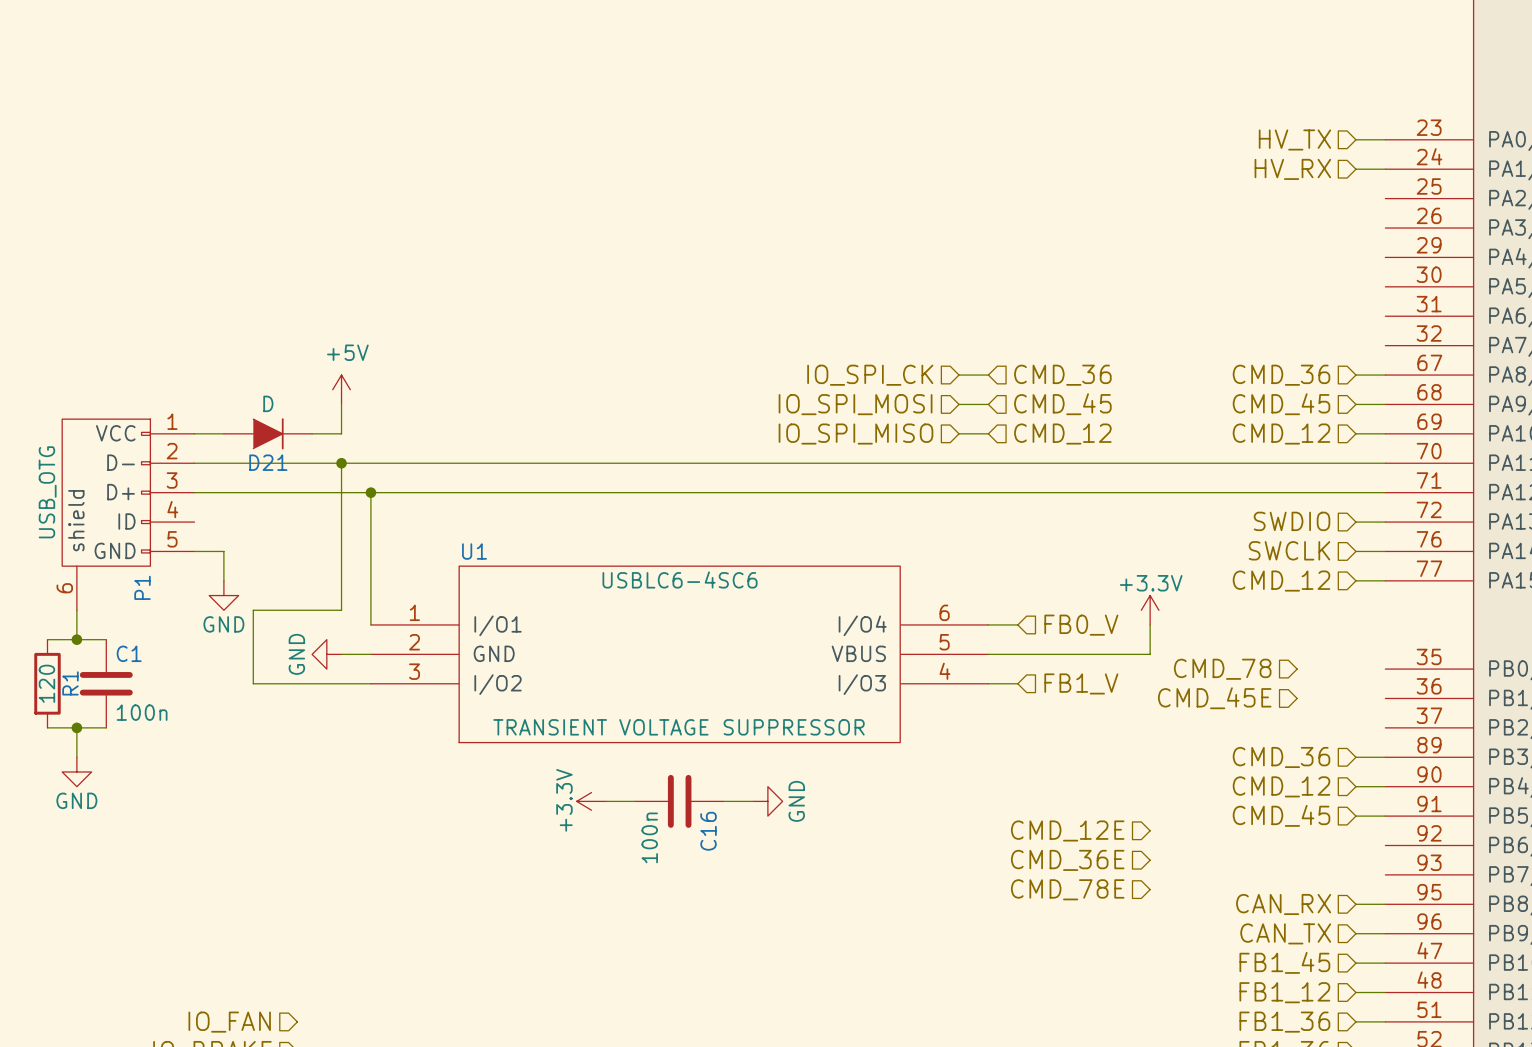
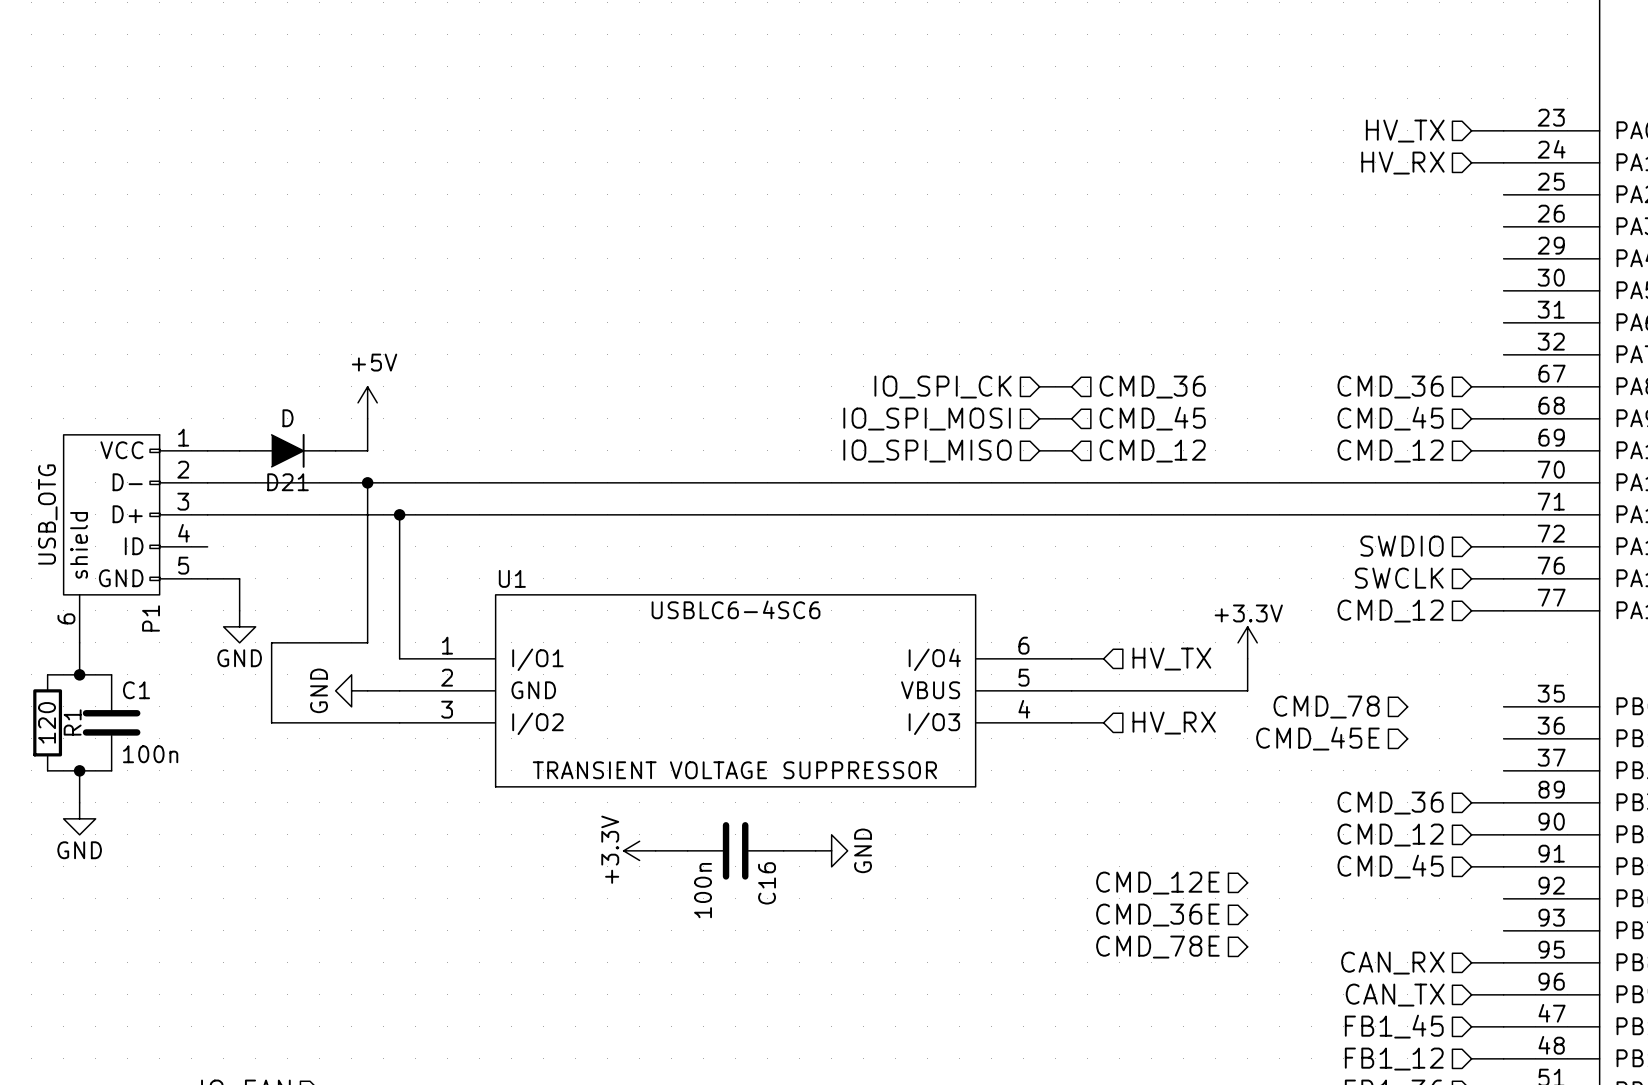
hierarchical label: FB0_V (1081, 625) -> HV_TX (1171, 659)
hierarchical label: FB1_V (1081, 683) -> HV_RX (1174, 723)

